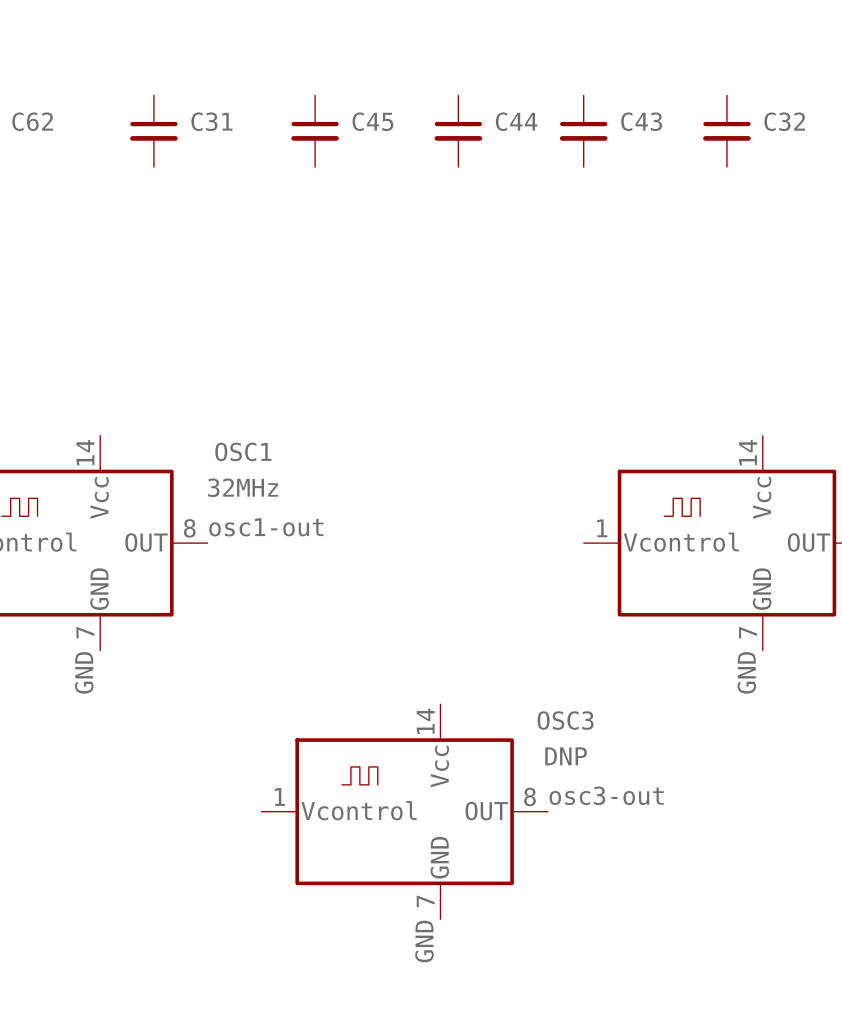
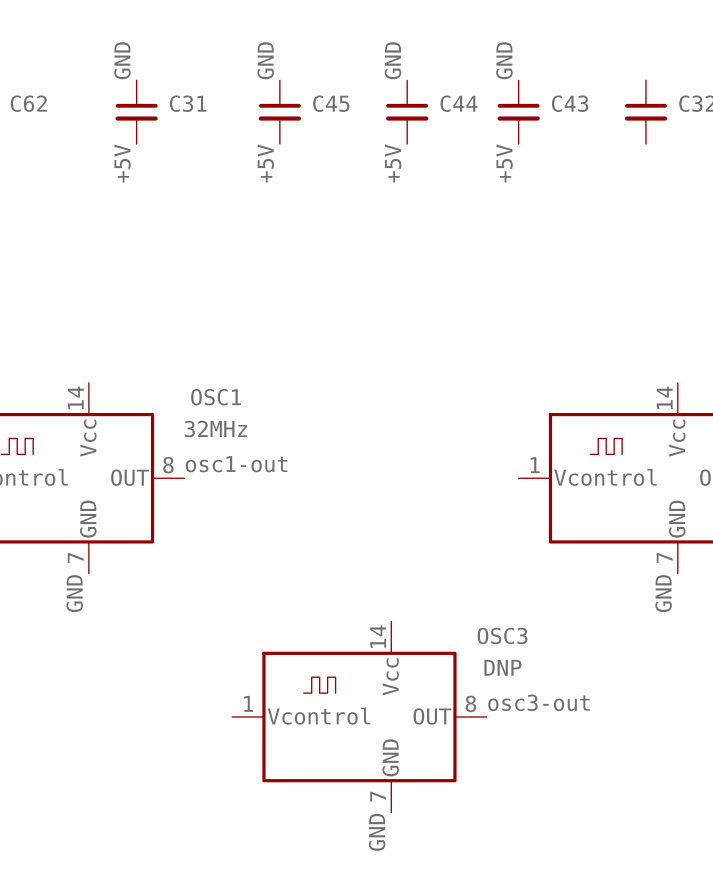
label: none -> GND (122, 60)
label: none -> GND (265, 60)
label: none -> GND (393, 60)
label: none -> GND (504, 60)
label: none -> +5V (122, 163)
label: none -> +5V (265, 163)
label: none -> +5V (393, 163)
label: none -> +5V (504, 163)

